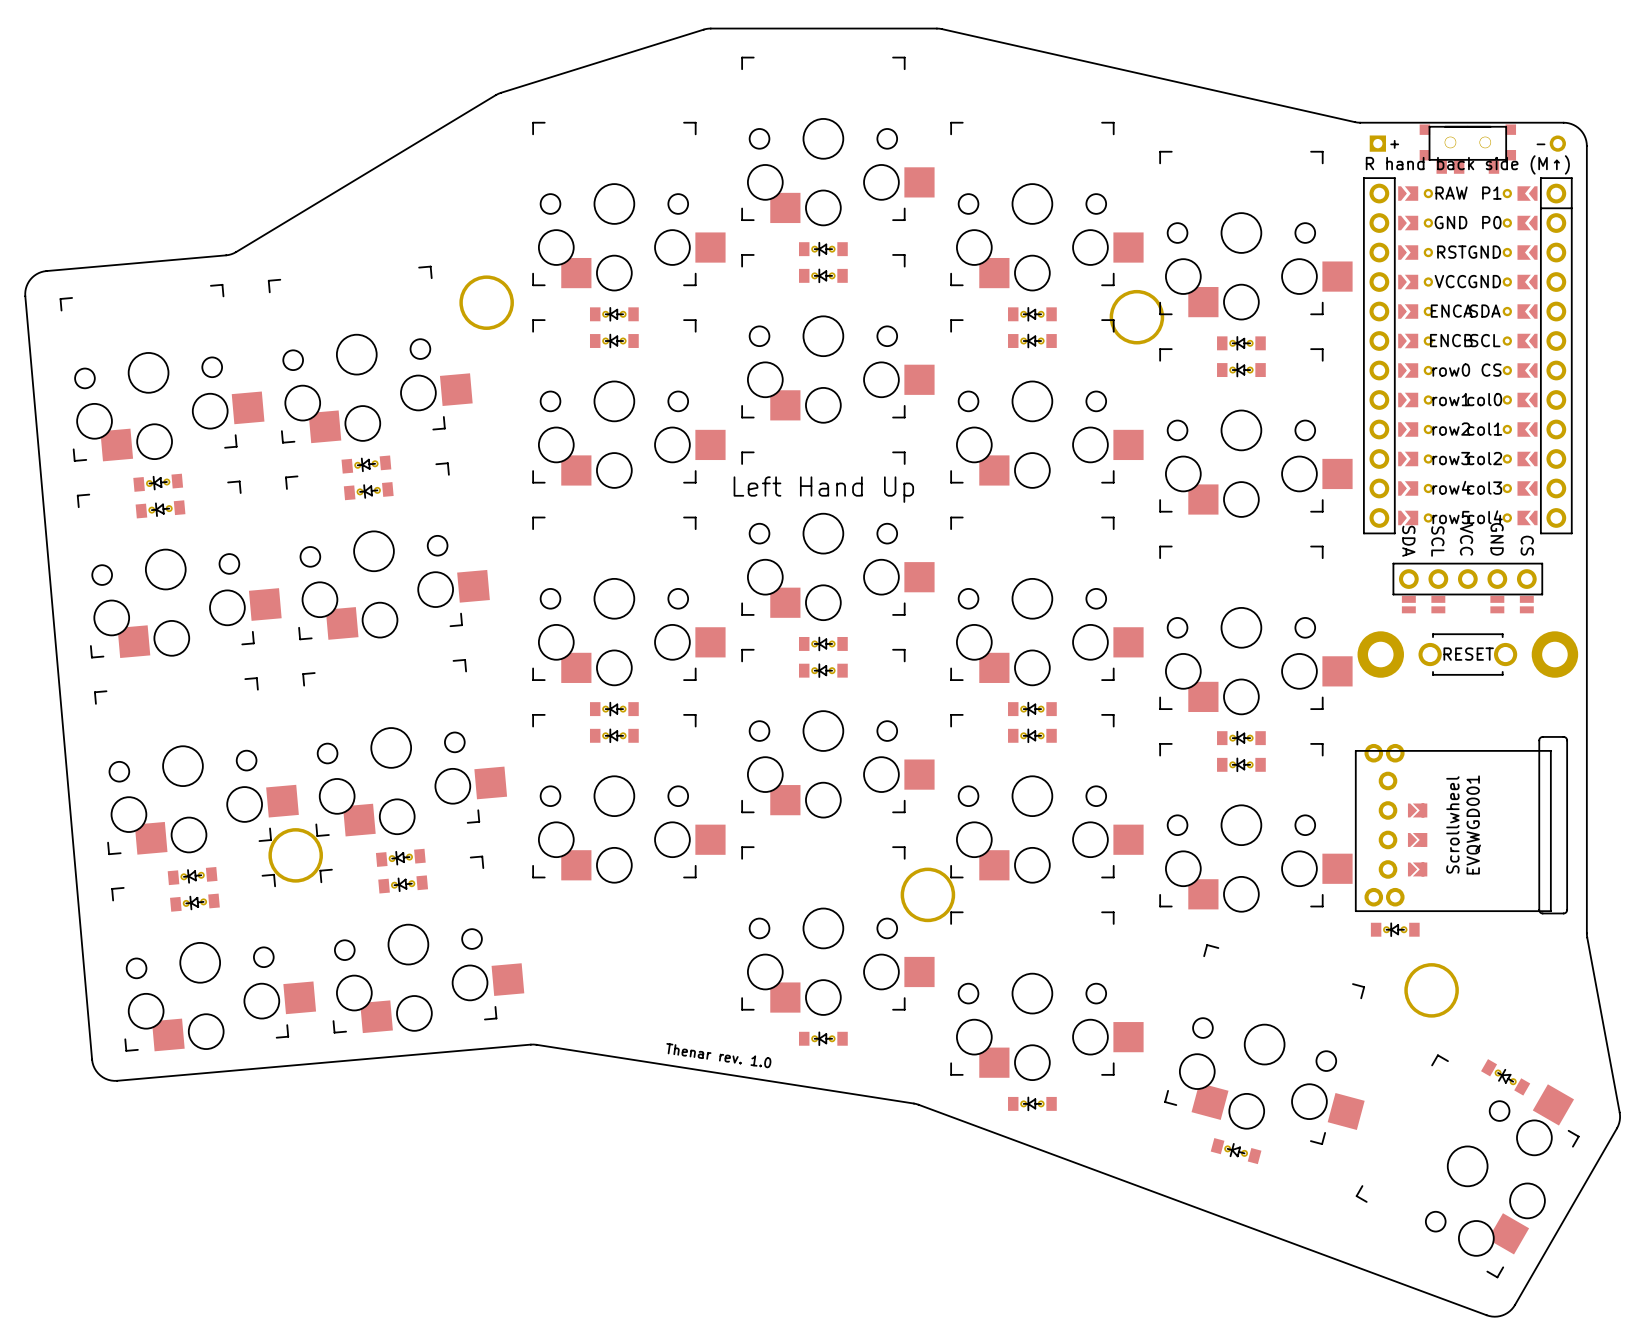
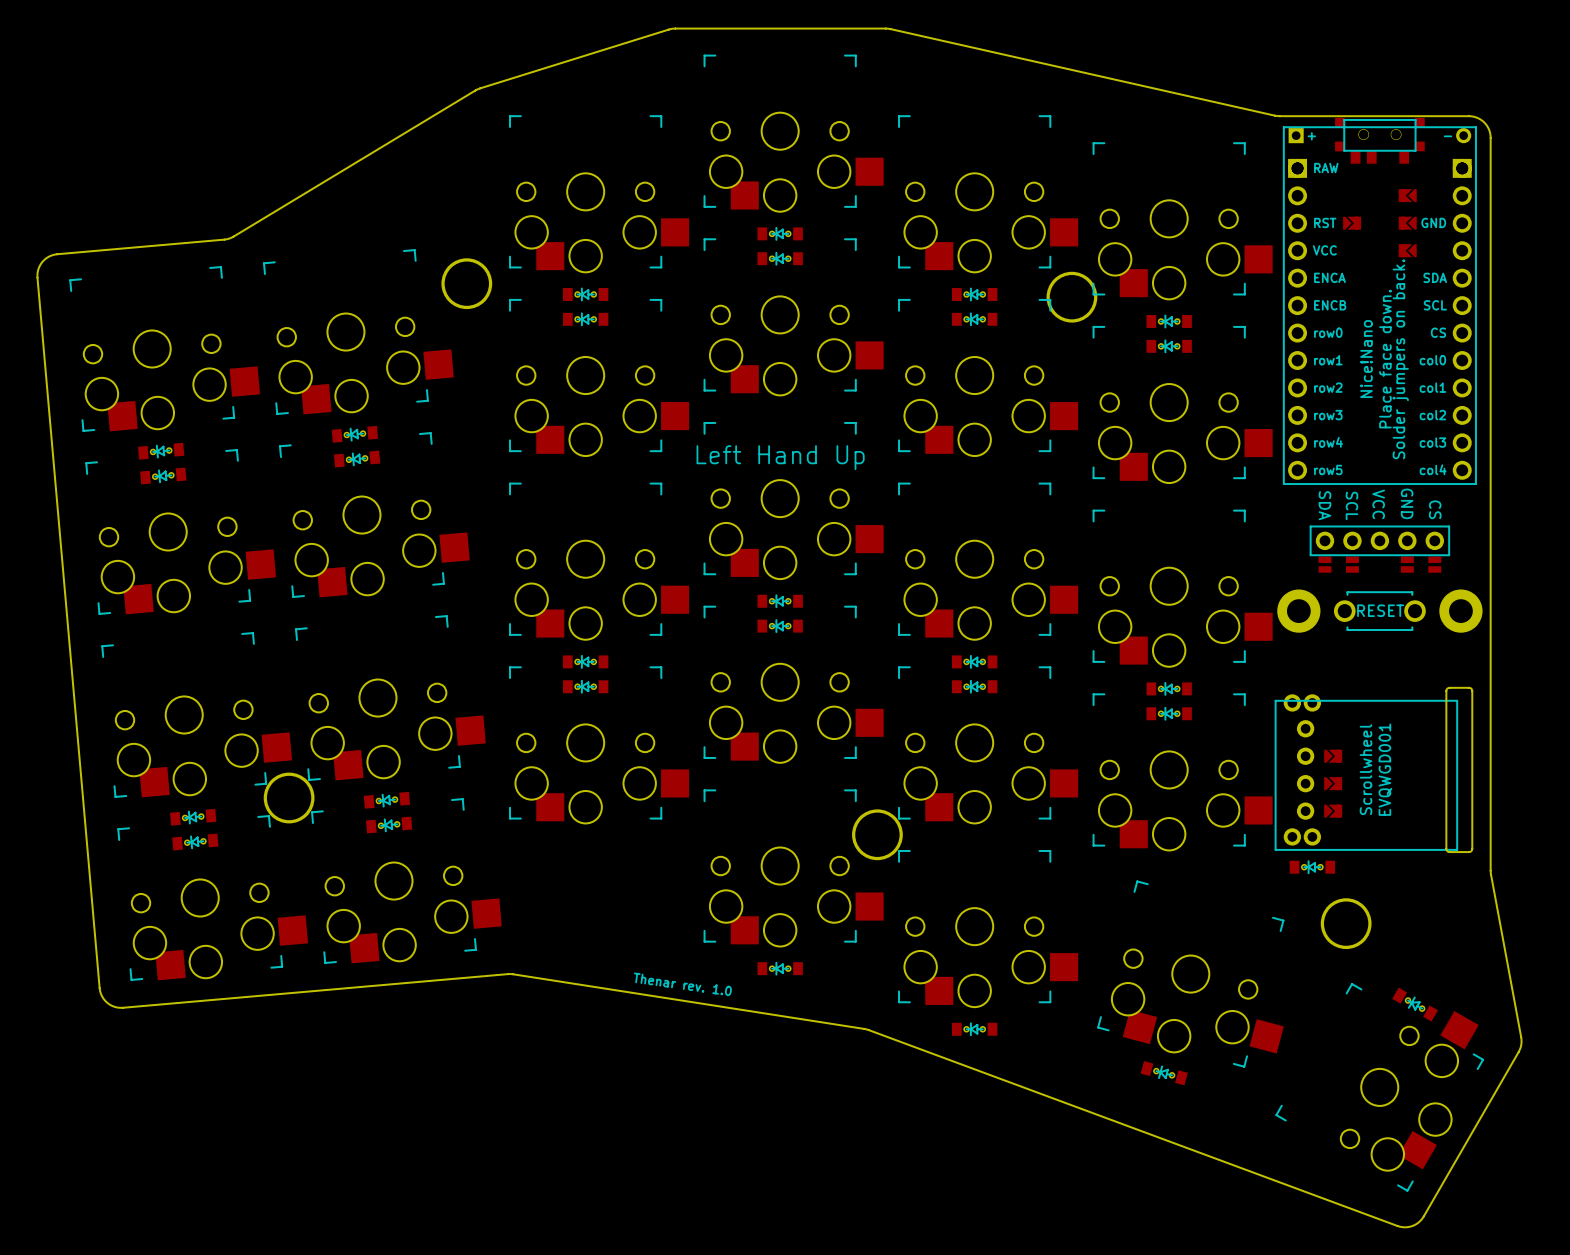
part: none -> (1407, 195)
part: none -> (1352, 223)
part: none -> (1407, 223)
part: none -> (1407, 250)
part: none -> (1379, 305)
part: (1467, 355) -> none

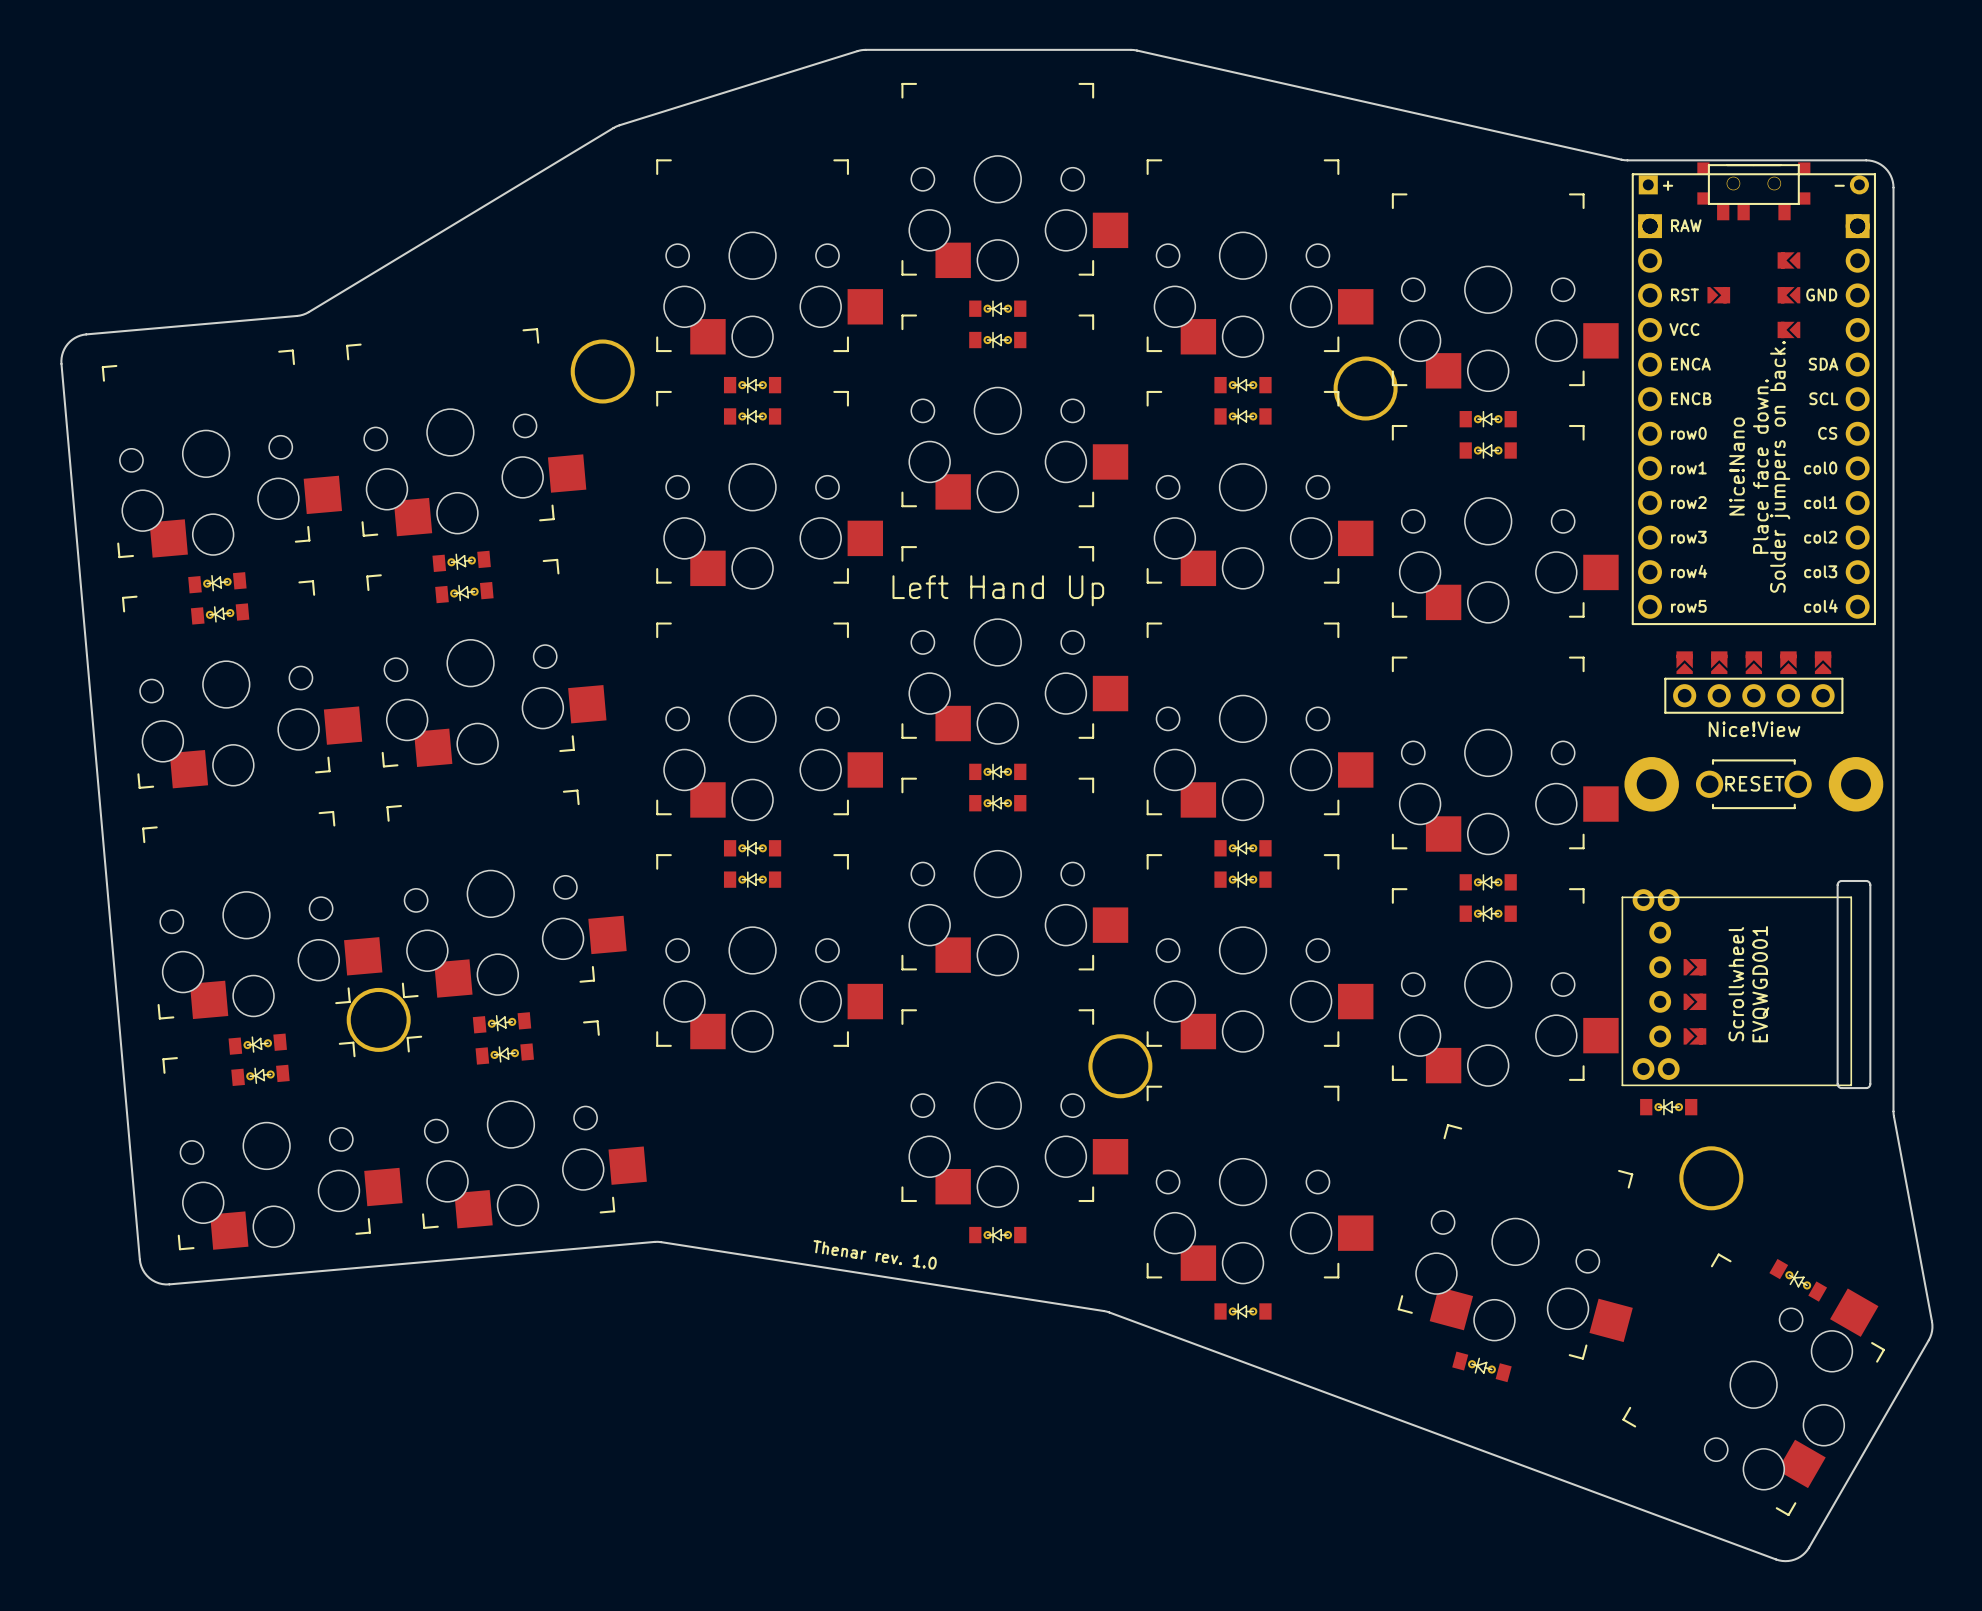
part: none -> (1684, 662)
part: none -> (1719, 662)
part: none -> (1753, 662)
part: none -> (1788, 662)
part: none -> (1823, 662)
part footprint: [1309, 525, 1450, 573] -> [1664, 677, 1844, 714]

